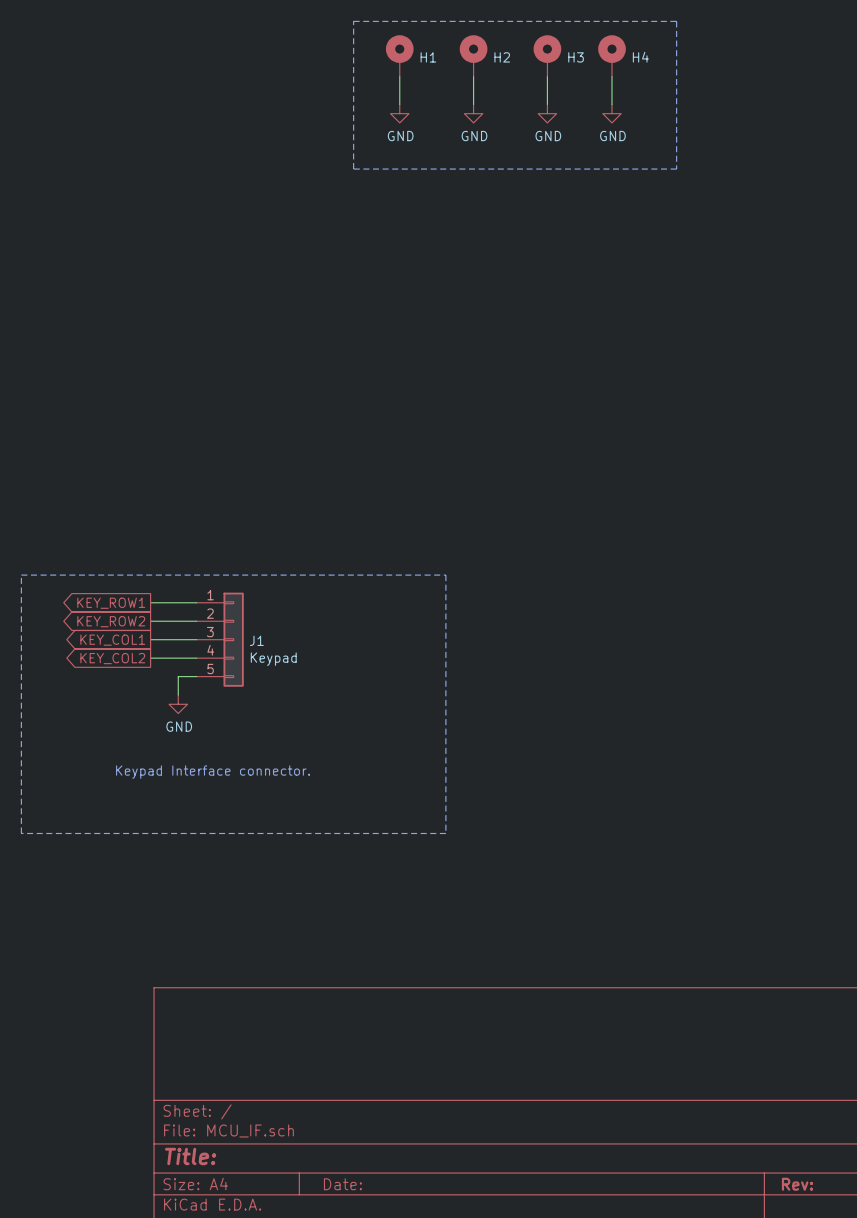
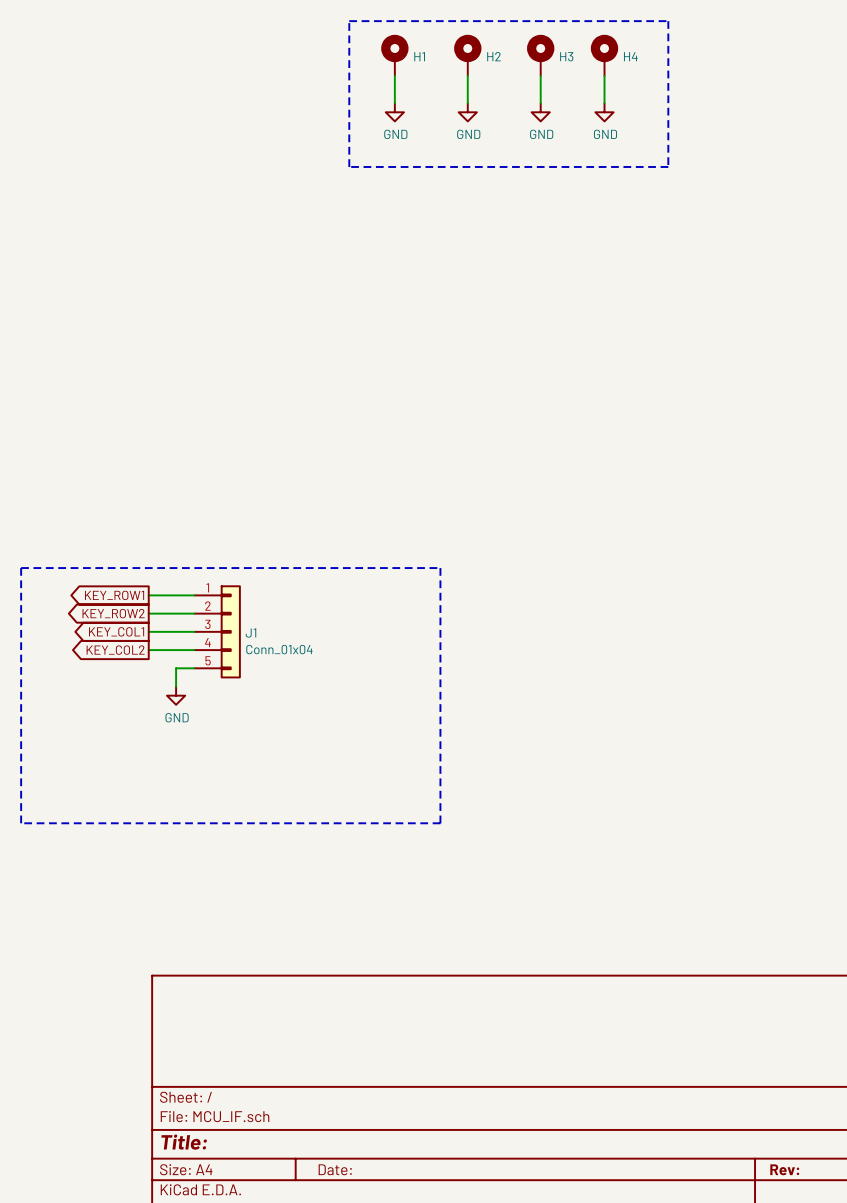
J1 value: Keypad (273, 659) -> Conn_01x04 (279, 649)
text: Keypad Interface connector. (213, 772) -> none

